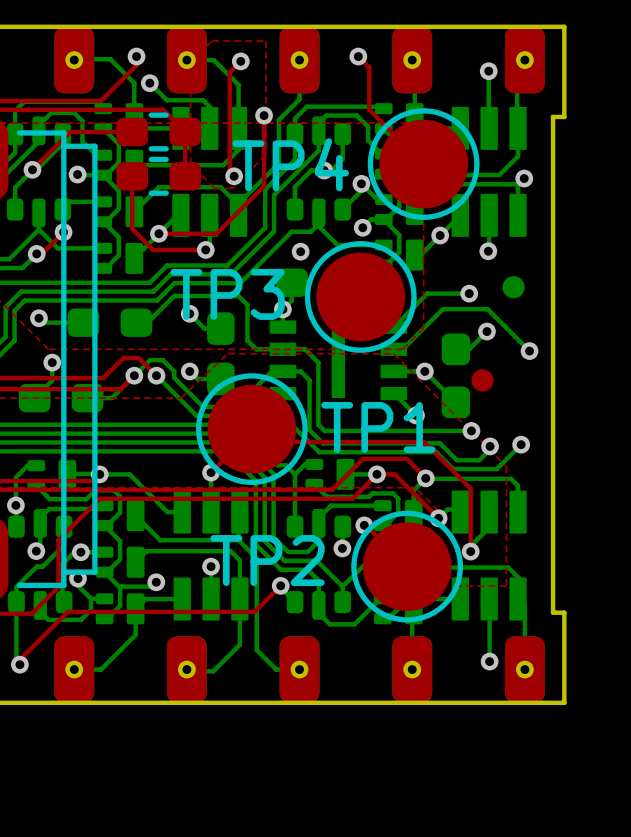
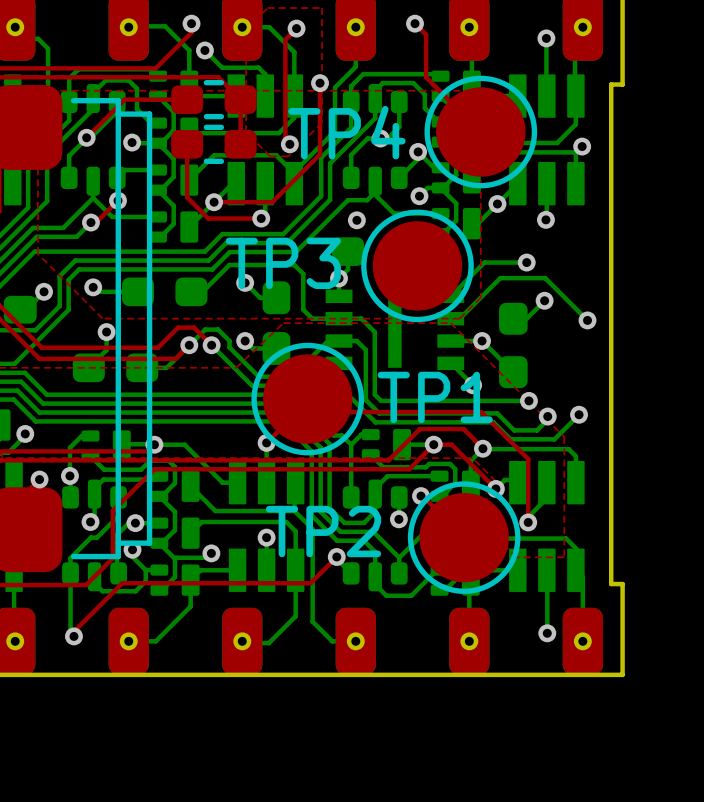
part: (513, 287) -> none
part: (482, 380) -> none

